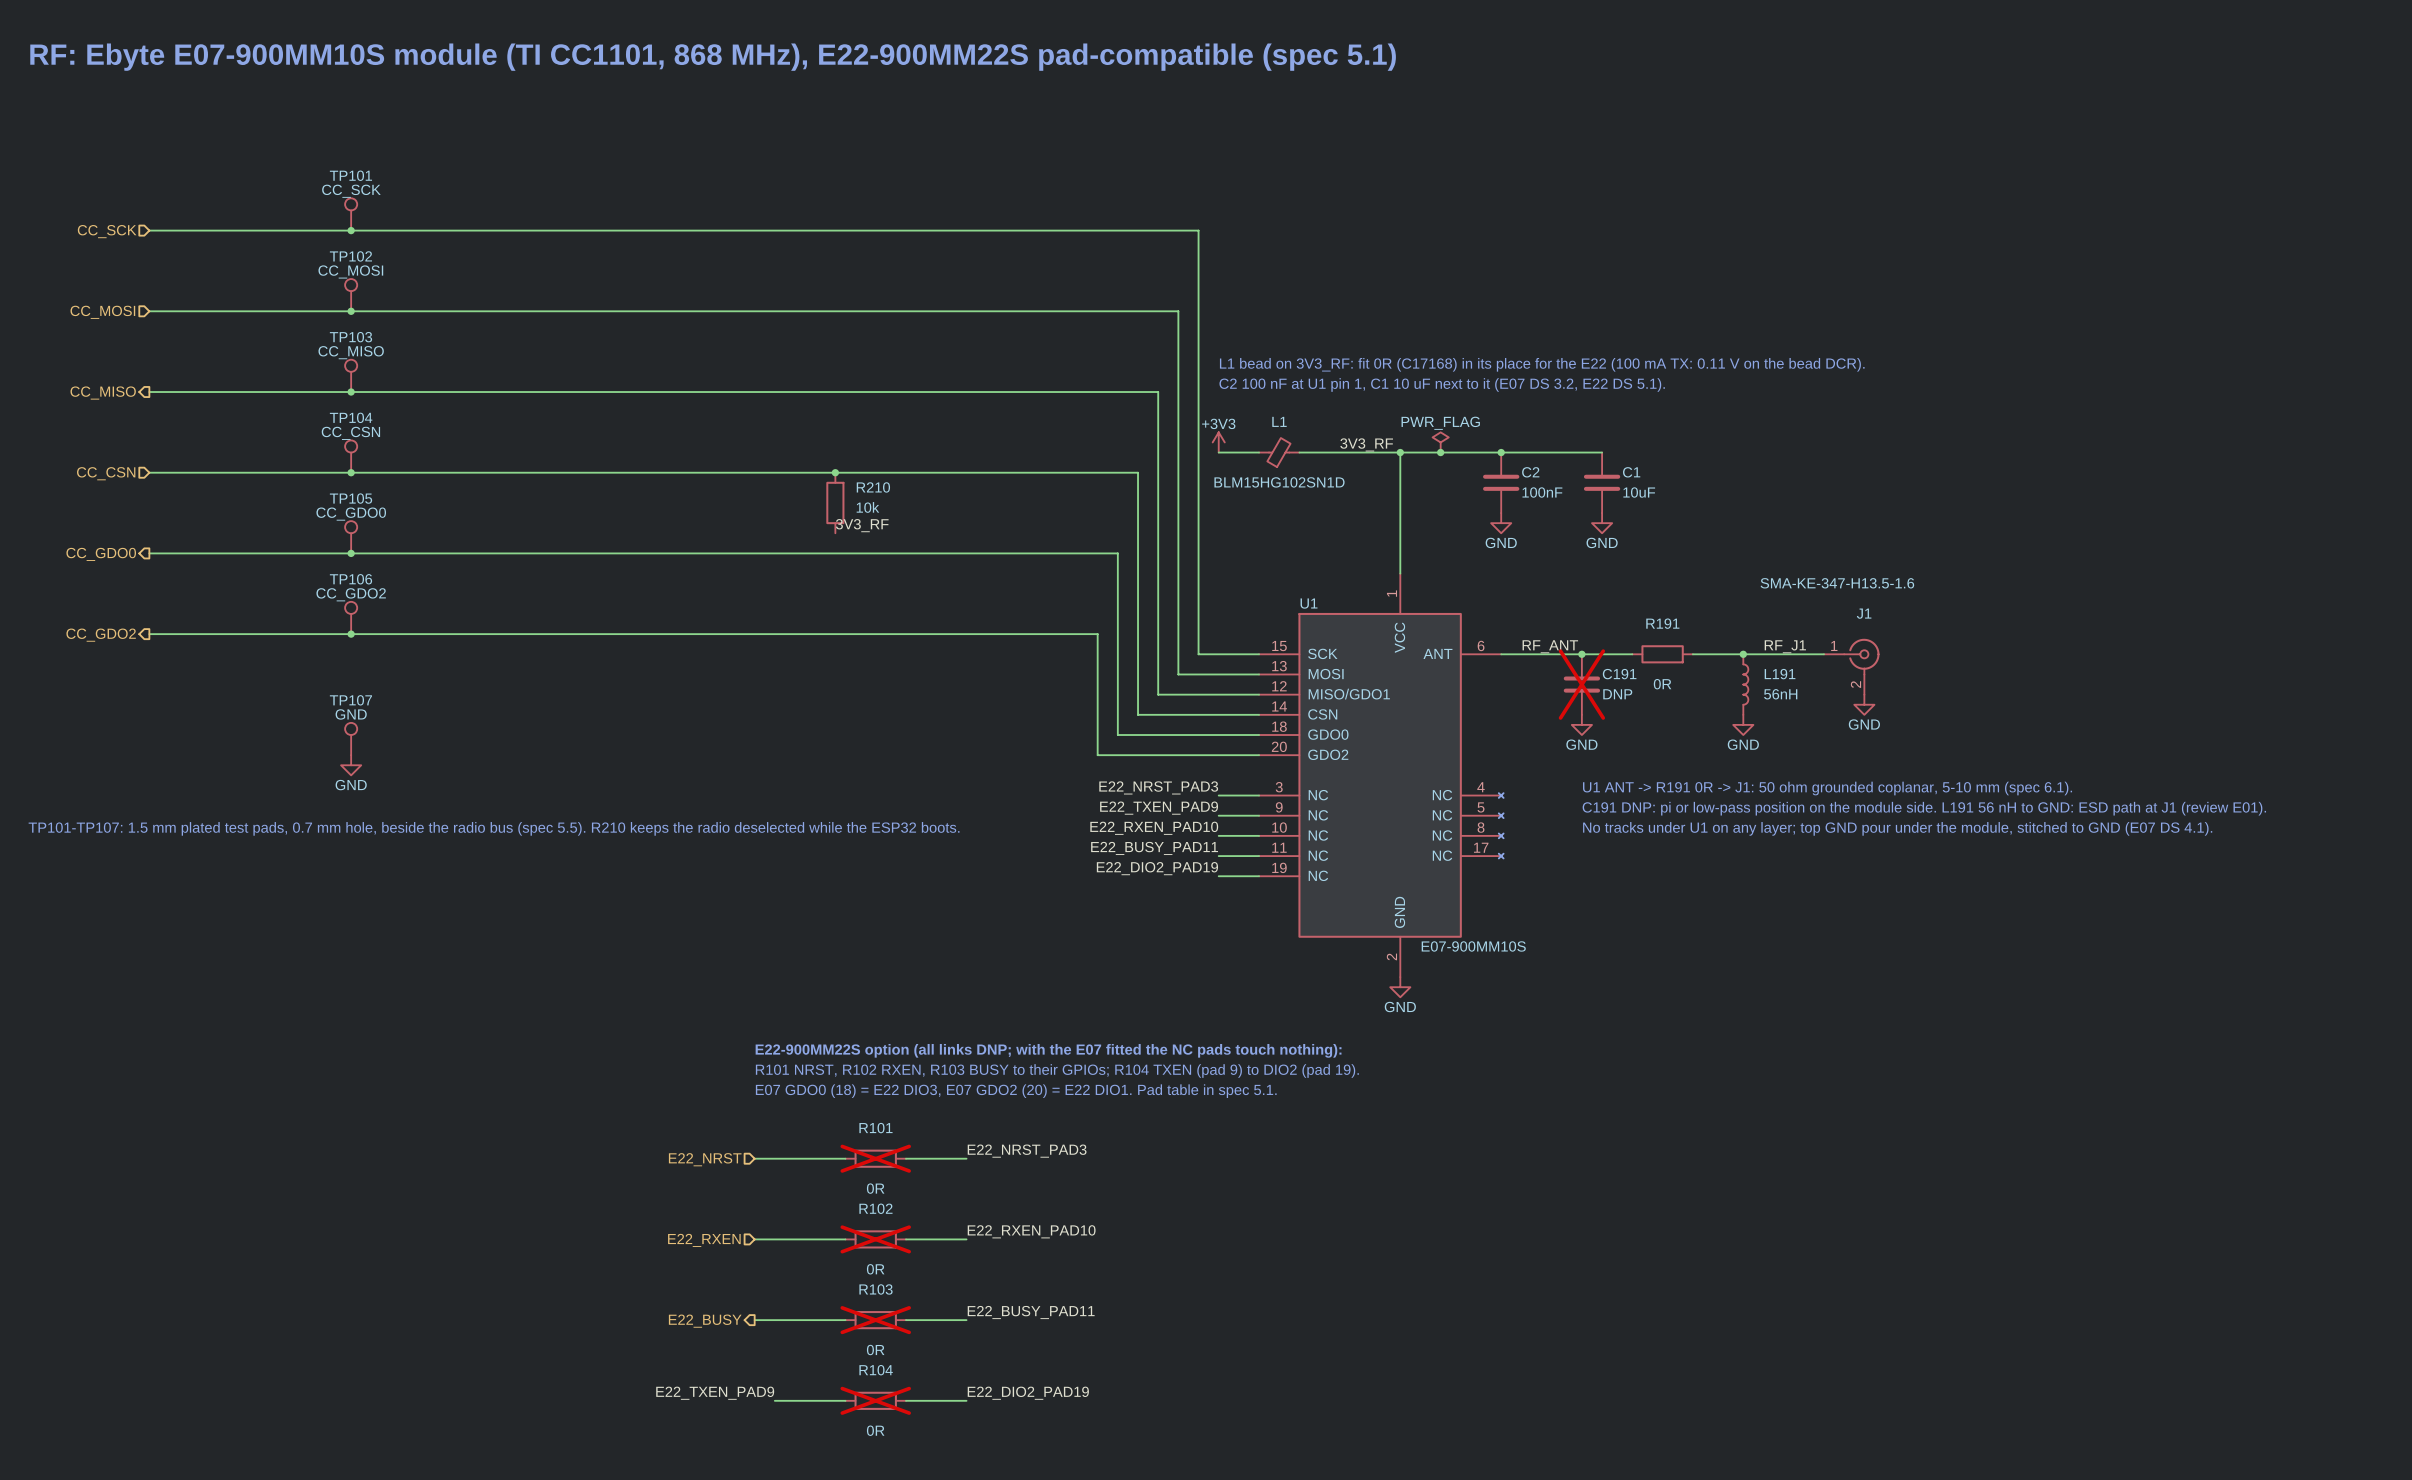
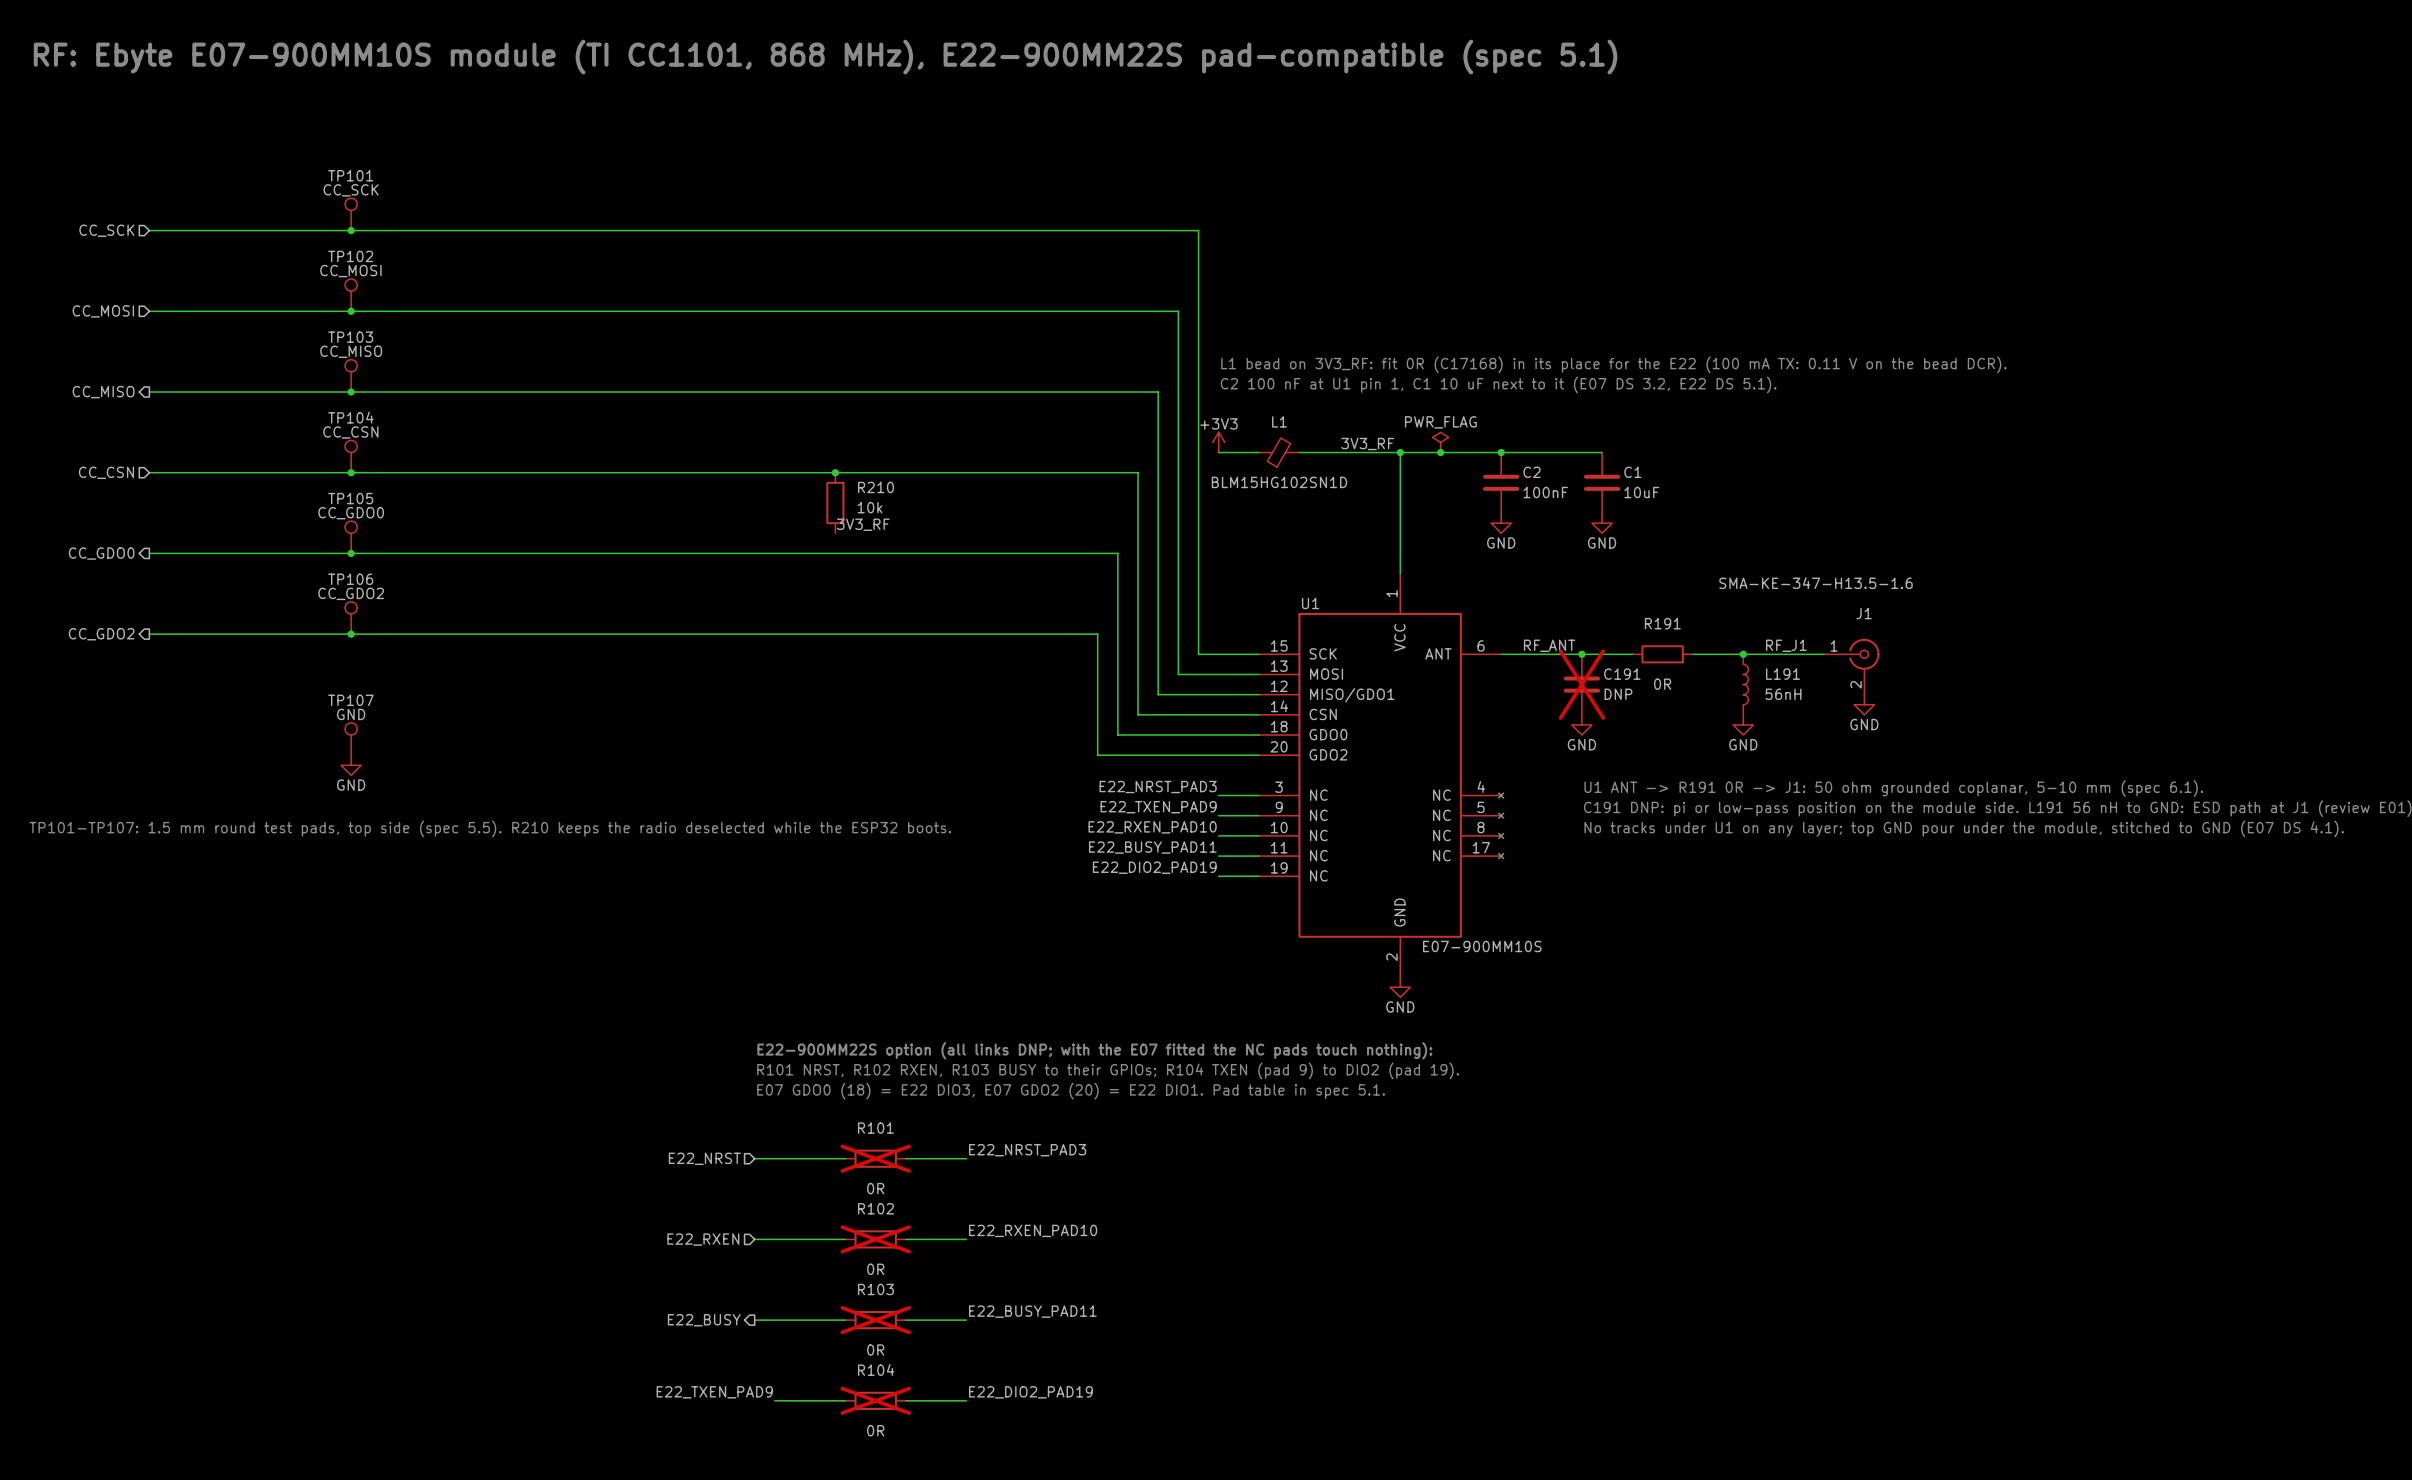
text: TP101-TP107: 1.5 mm plated test pads, 0.7 mm hole, beside the radio bus (spec 5.5). R210 keeps the radio deselected while the ESP32 boots. (494, 828) -> TP101-TP107: 1.5 mm round test pads, top side (spec 5.5). R210 keeps the radio deselected while the ESP32 boots. (490, 828)

